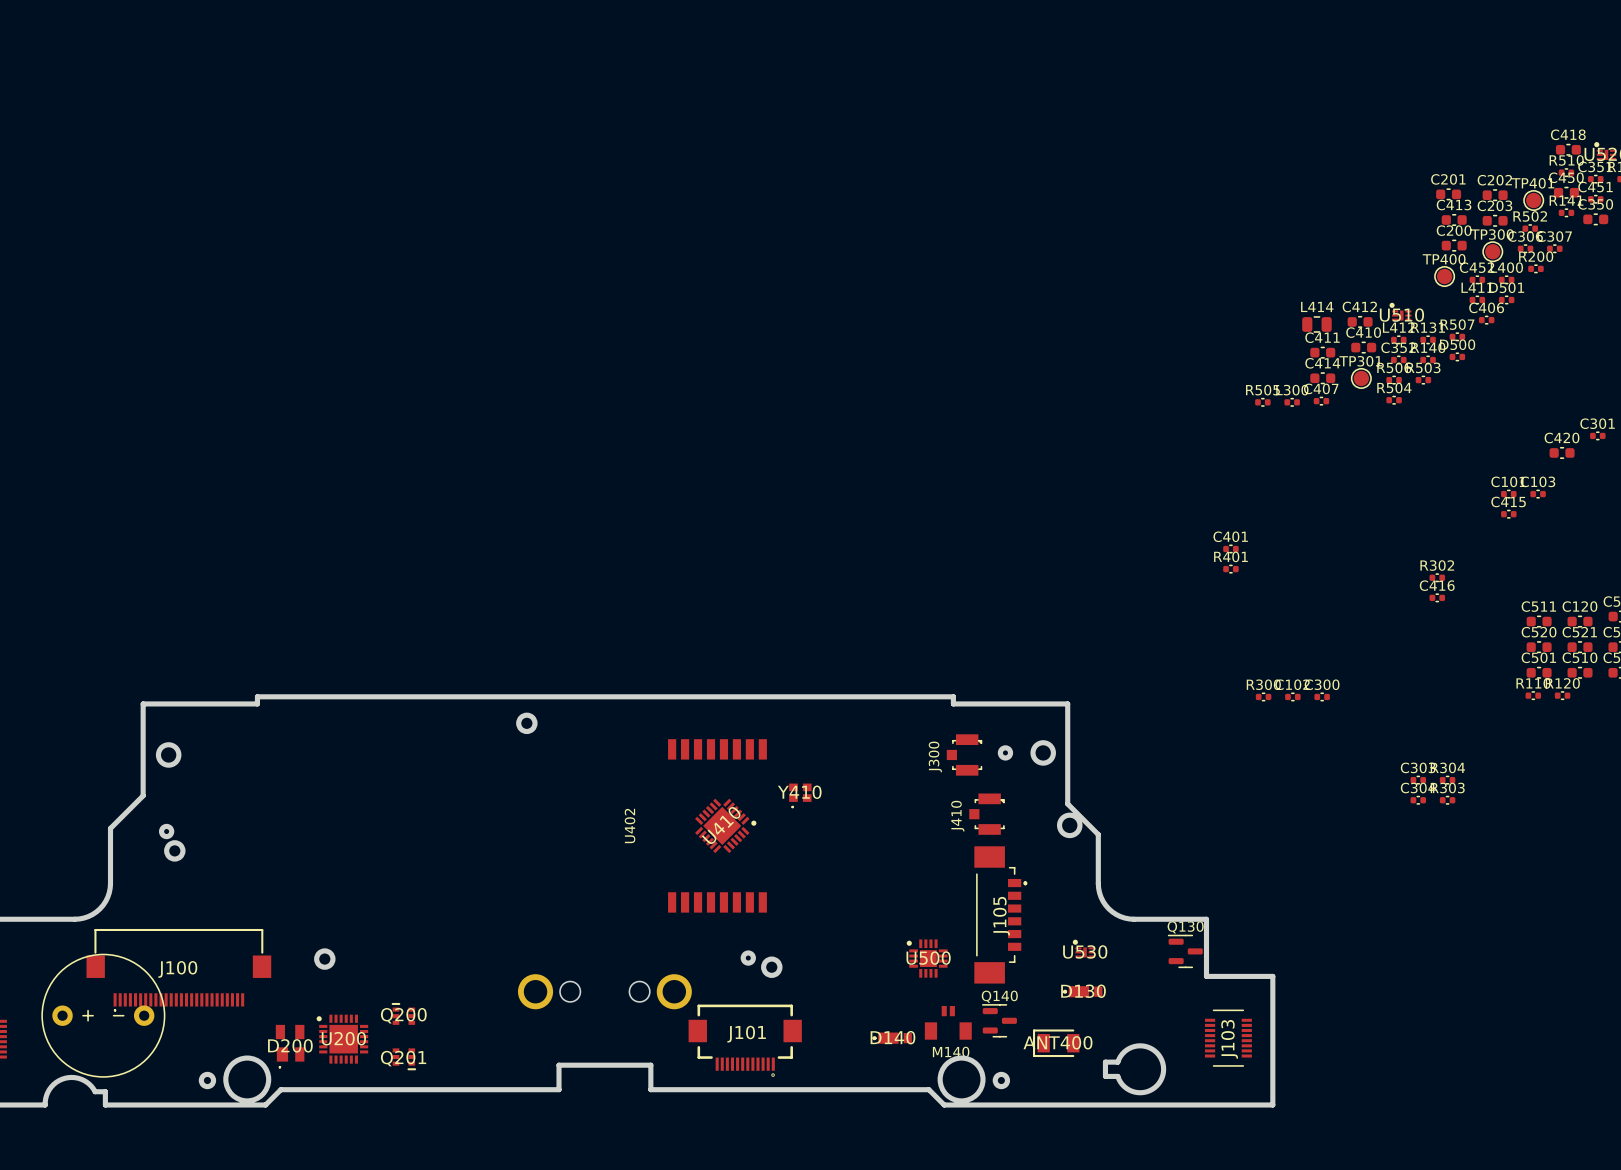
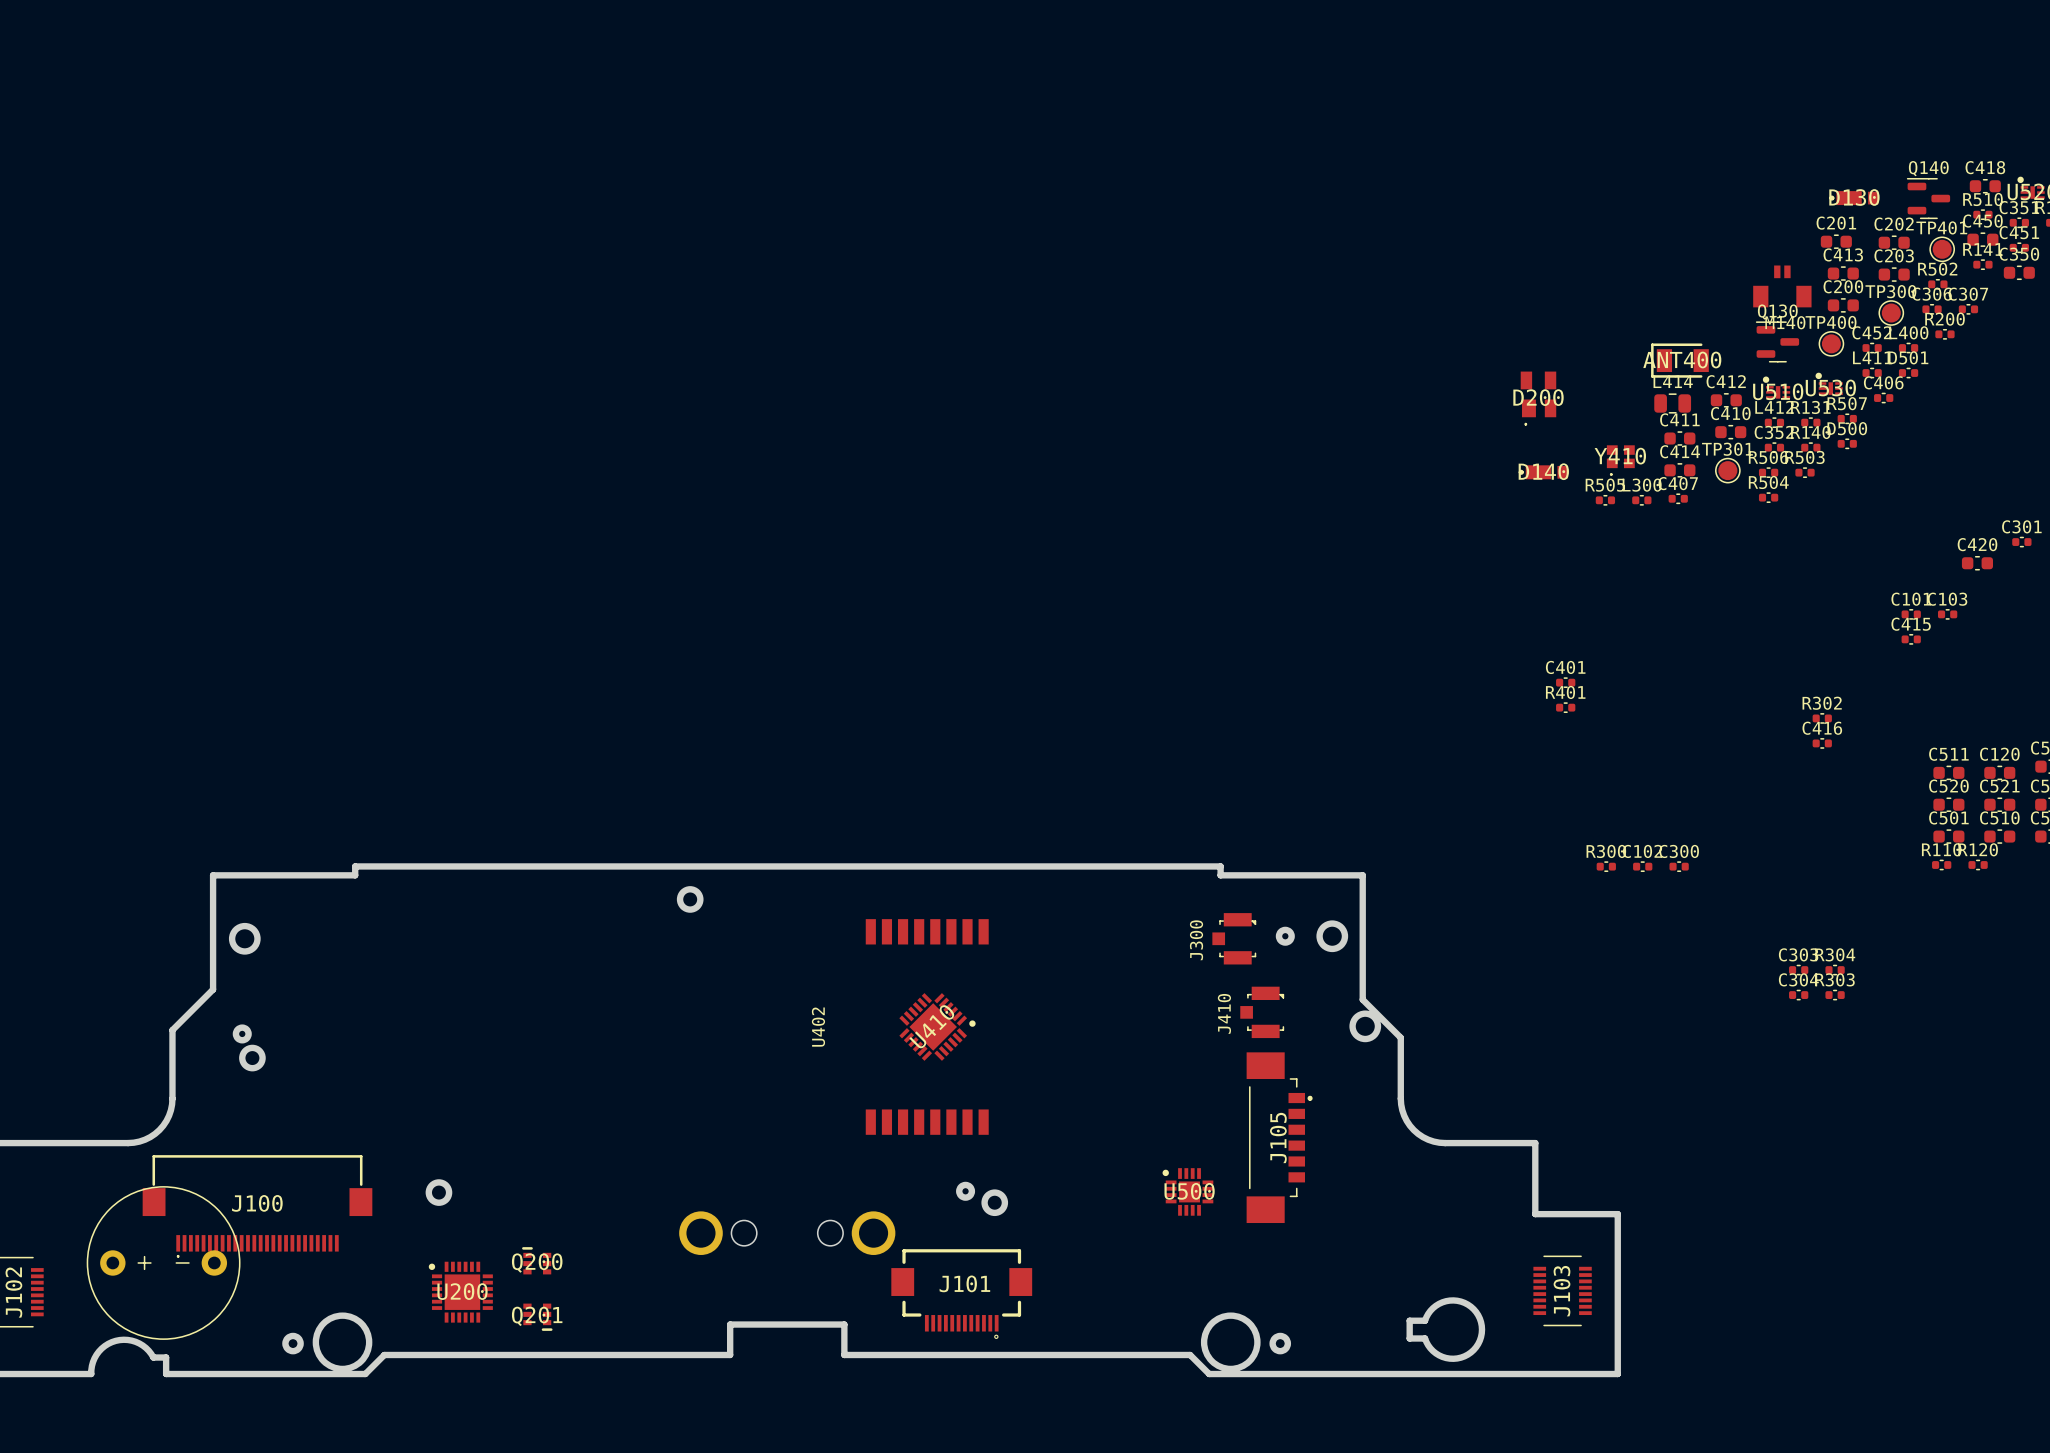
Y410 position: (800, 795) -> (1620, 460)
U530 position: (1083, 948) -> (1829, 383)
Q130 position: (1185, 951) -> (1777, 341)
D130 position: (1082, 991) -> (1853, 198)
Q140 position: (999, 1020) -> (1928, 198)
M140 position: (948, 1022) -> (1782, 286)
D140 position: (892, 1038) -> (1543, 472)
ANT400 position: (1056, 1043) -> (1679, 360)
D200 position: (290, 1046) -> (1538, 398)

